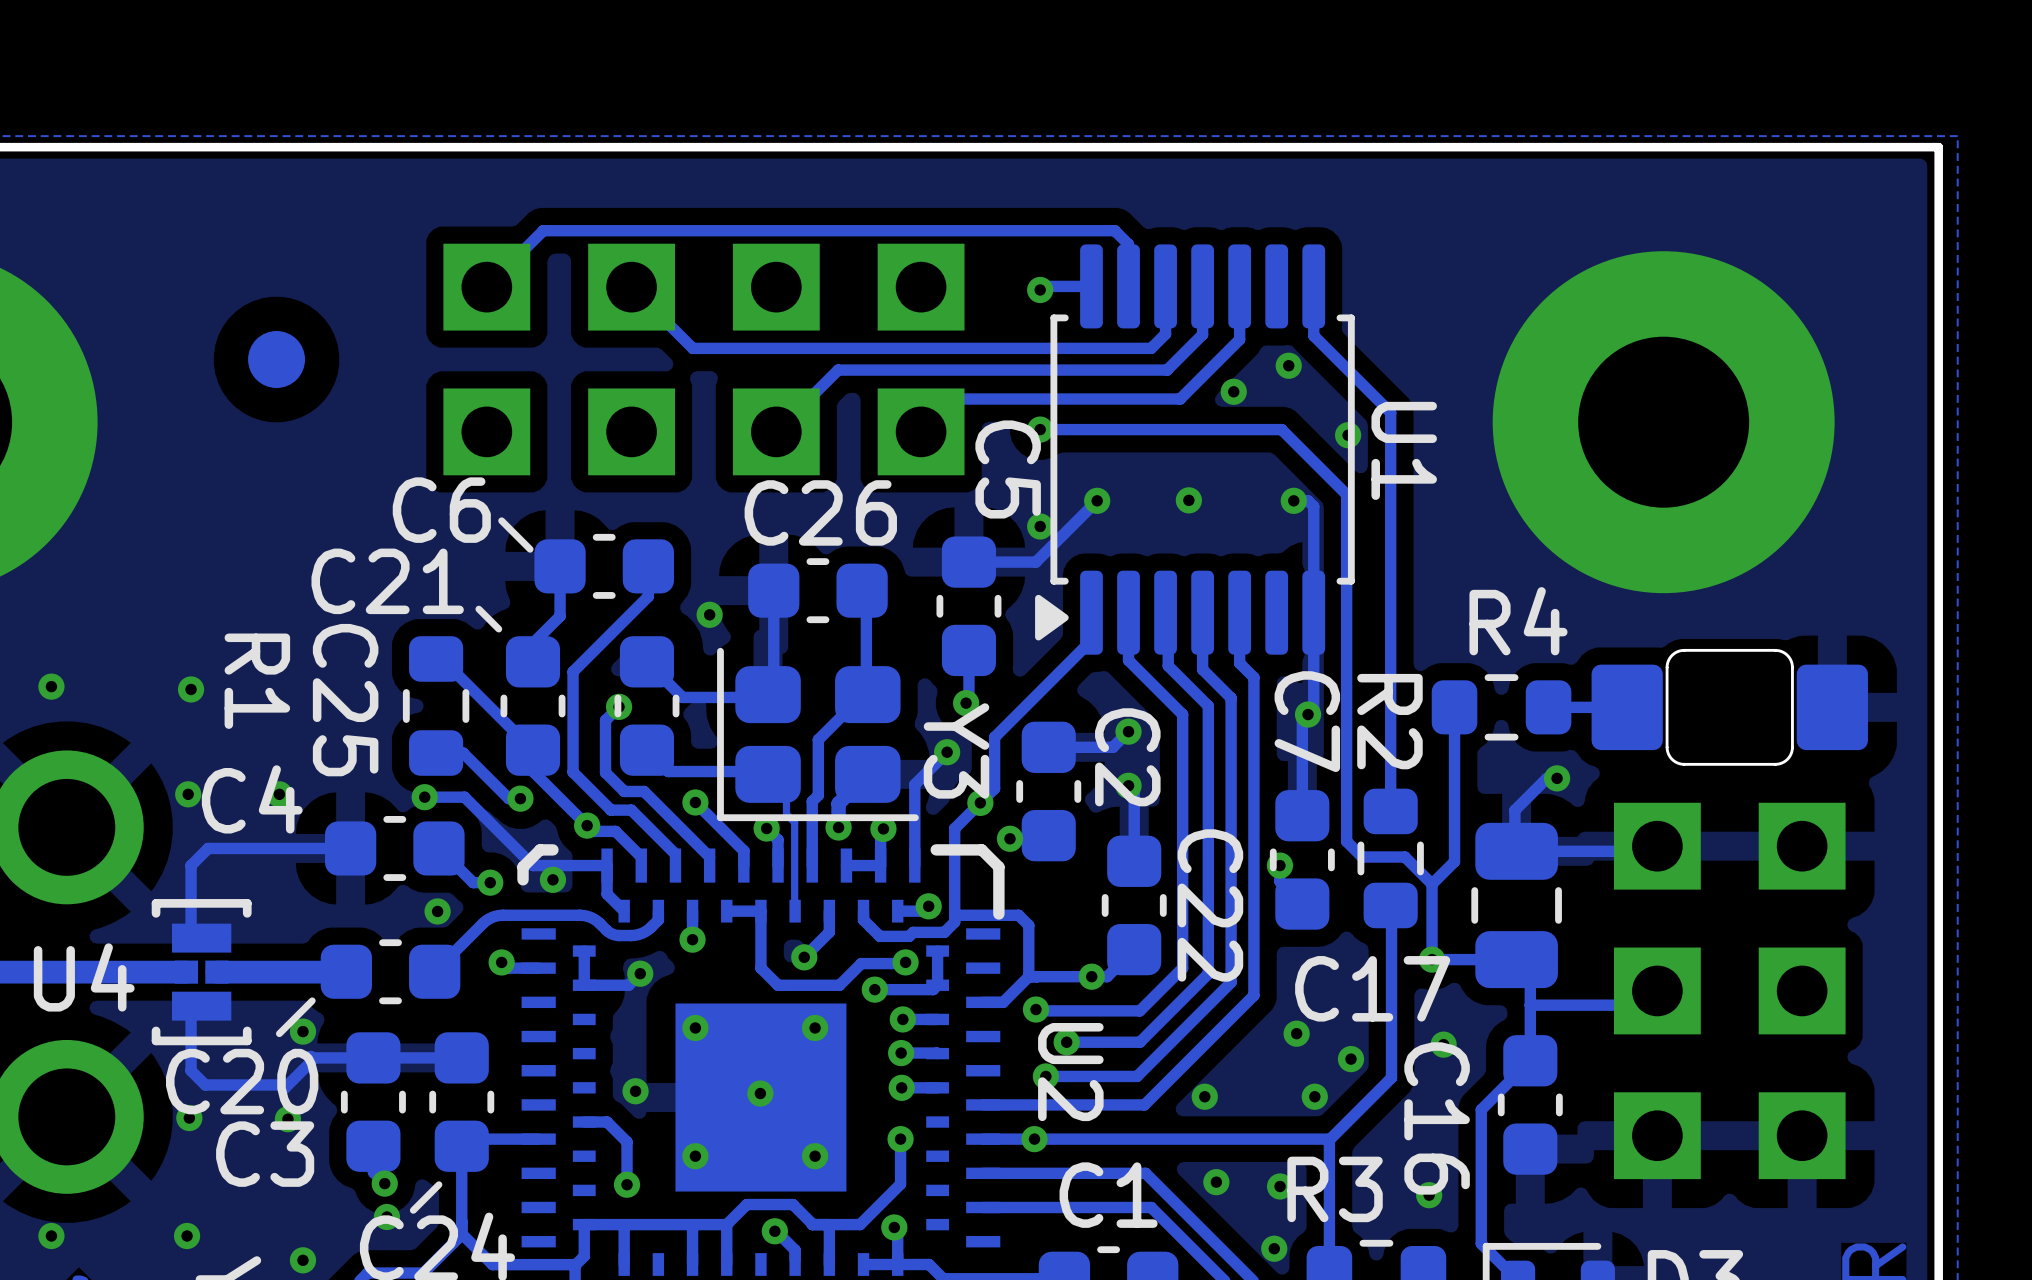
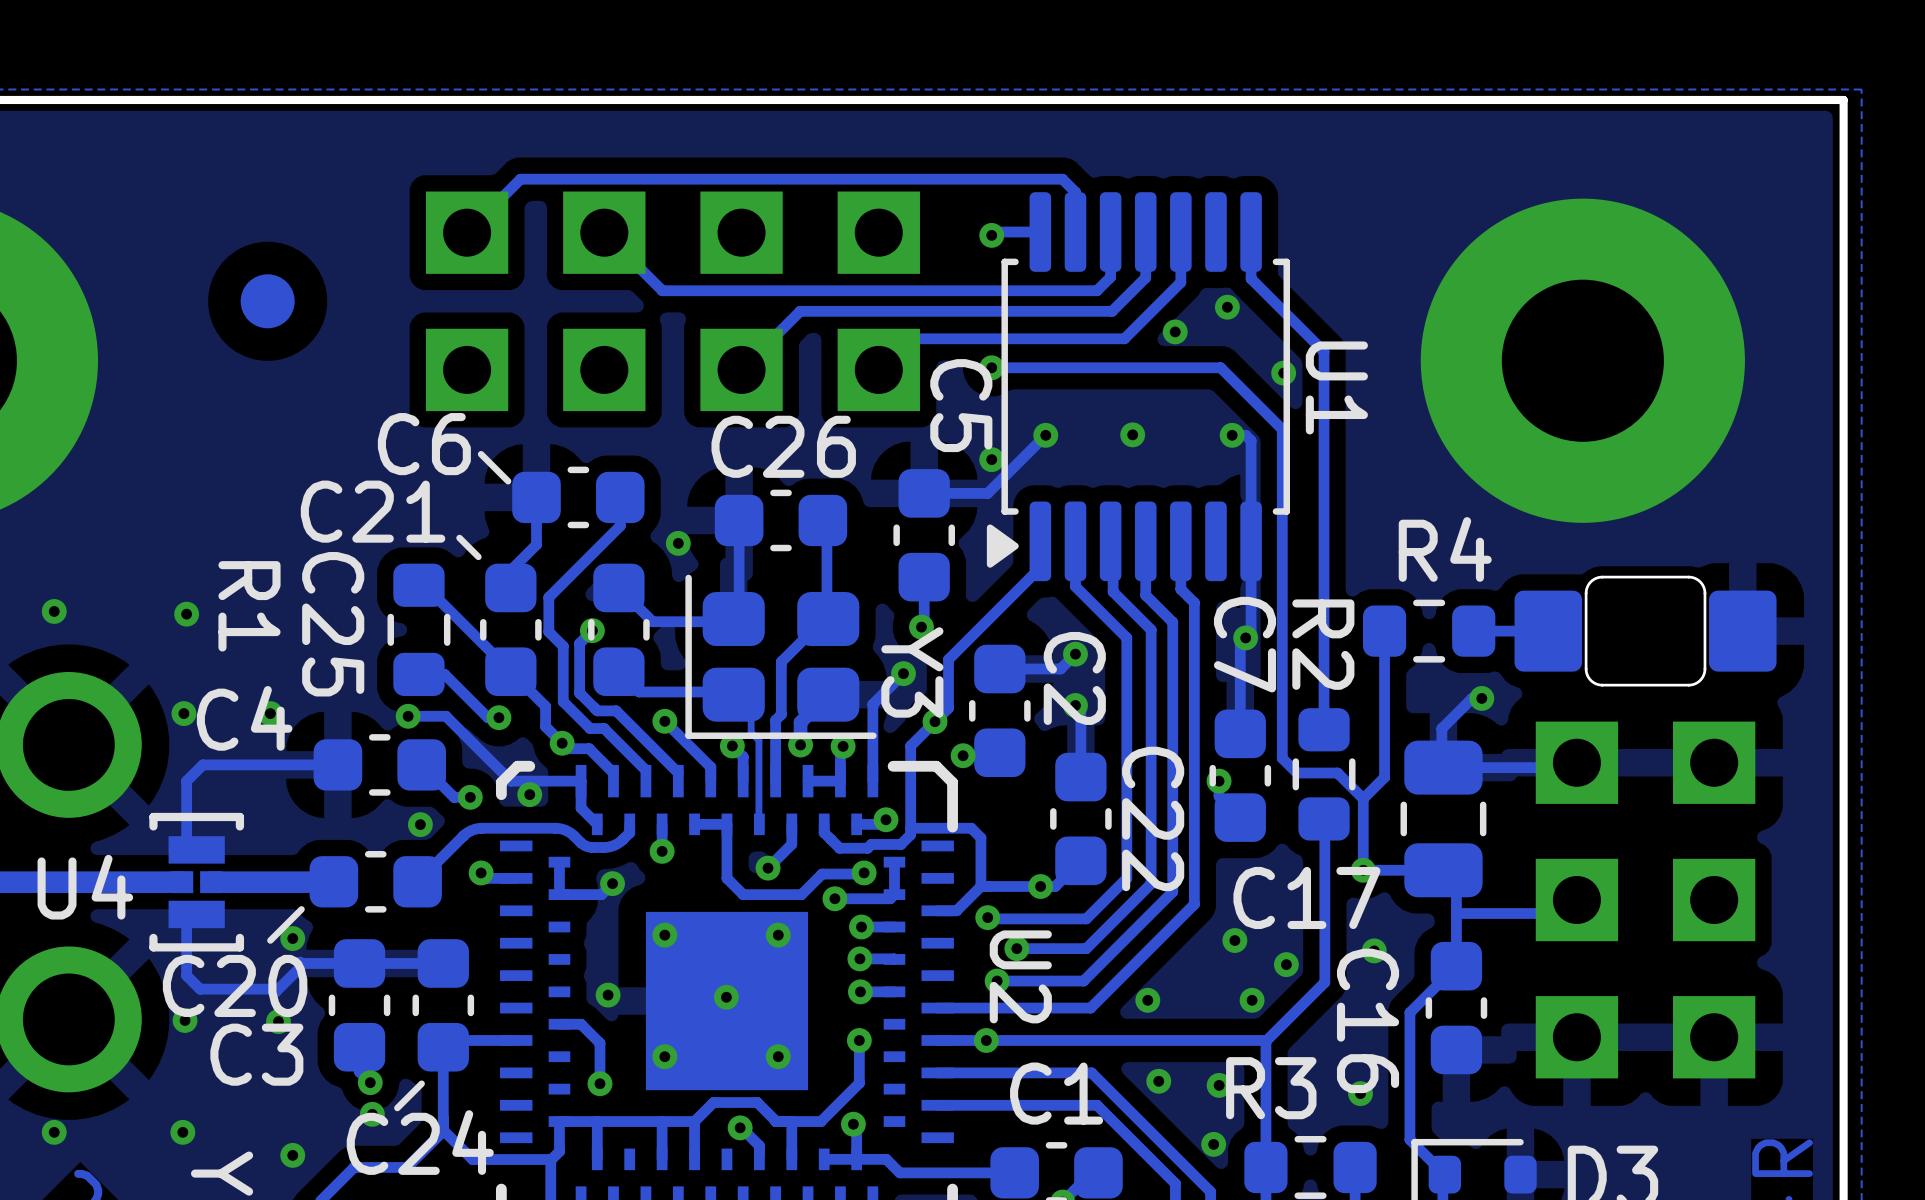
track: (573, 708) (573, 772) (610, 810) (616, 810) -> (548, 631) (563, 646) (563, 701) (590, 728)
track: (532, 750) (532, 771) (569, 808) -> (510, 671) (545, 706) (545, 726)

